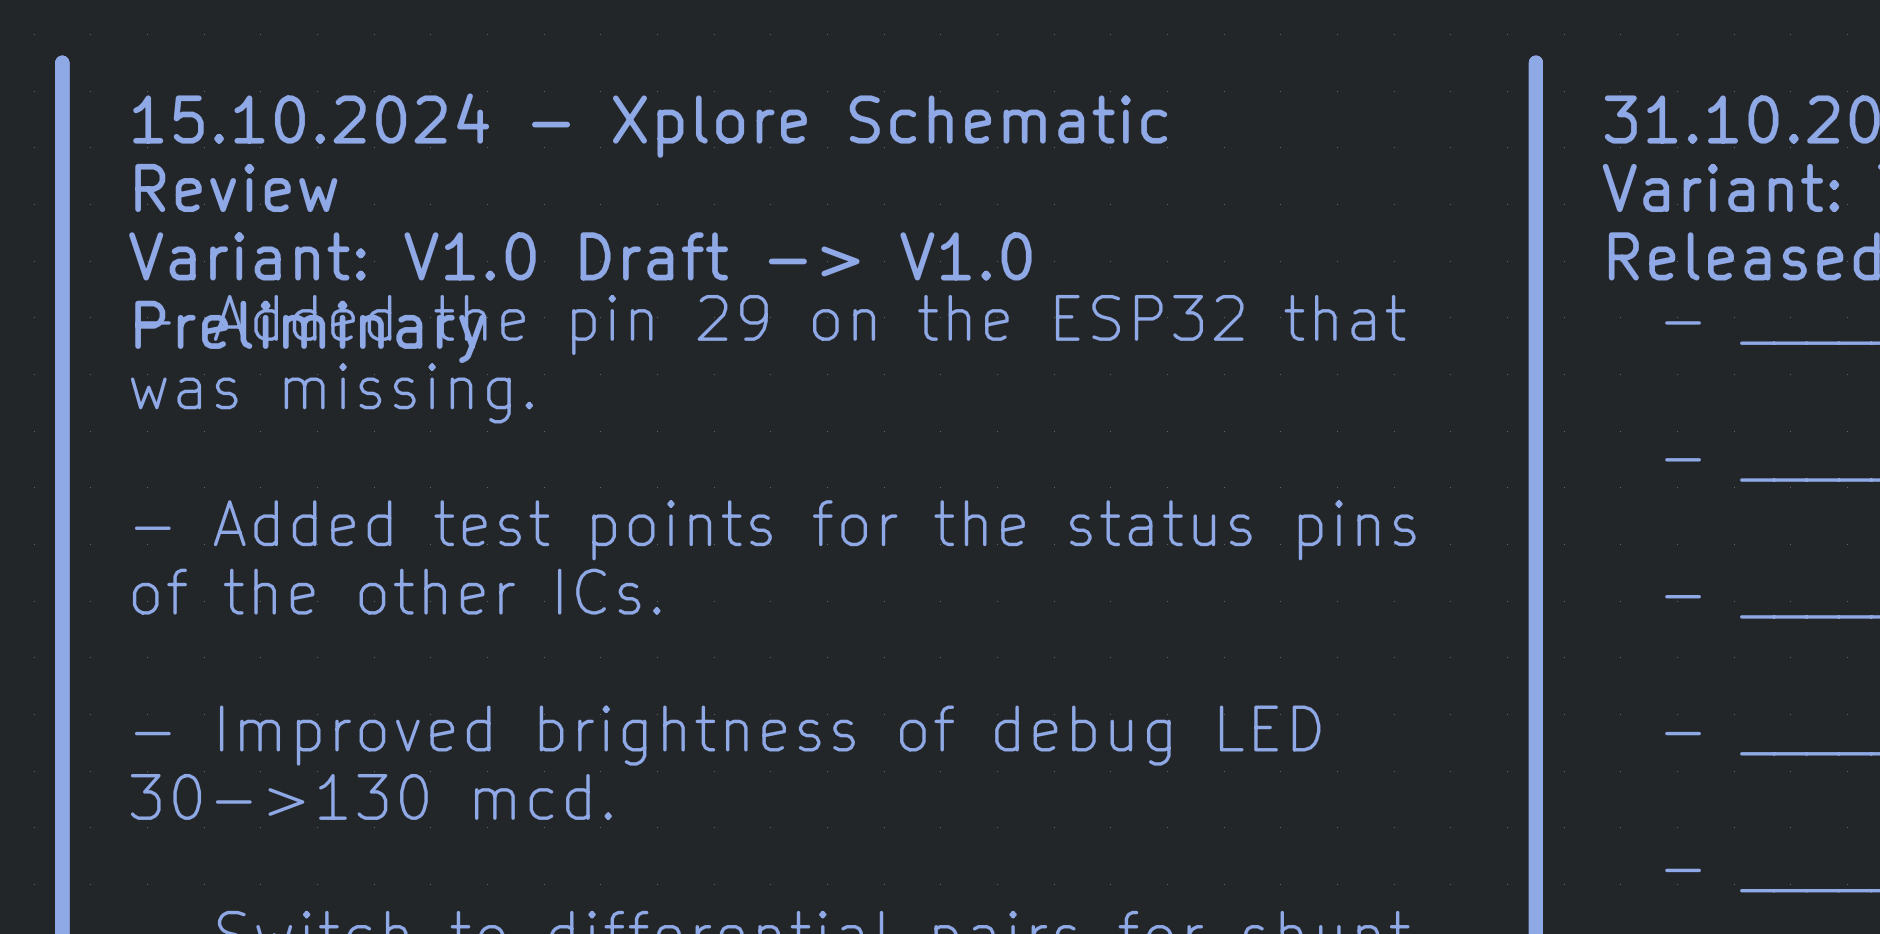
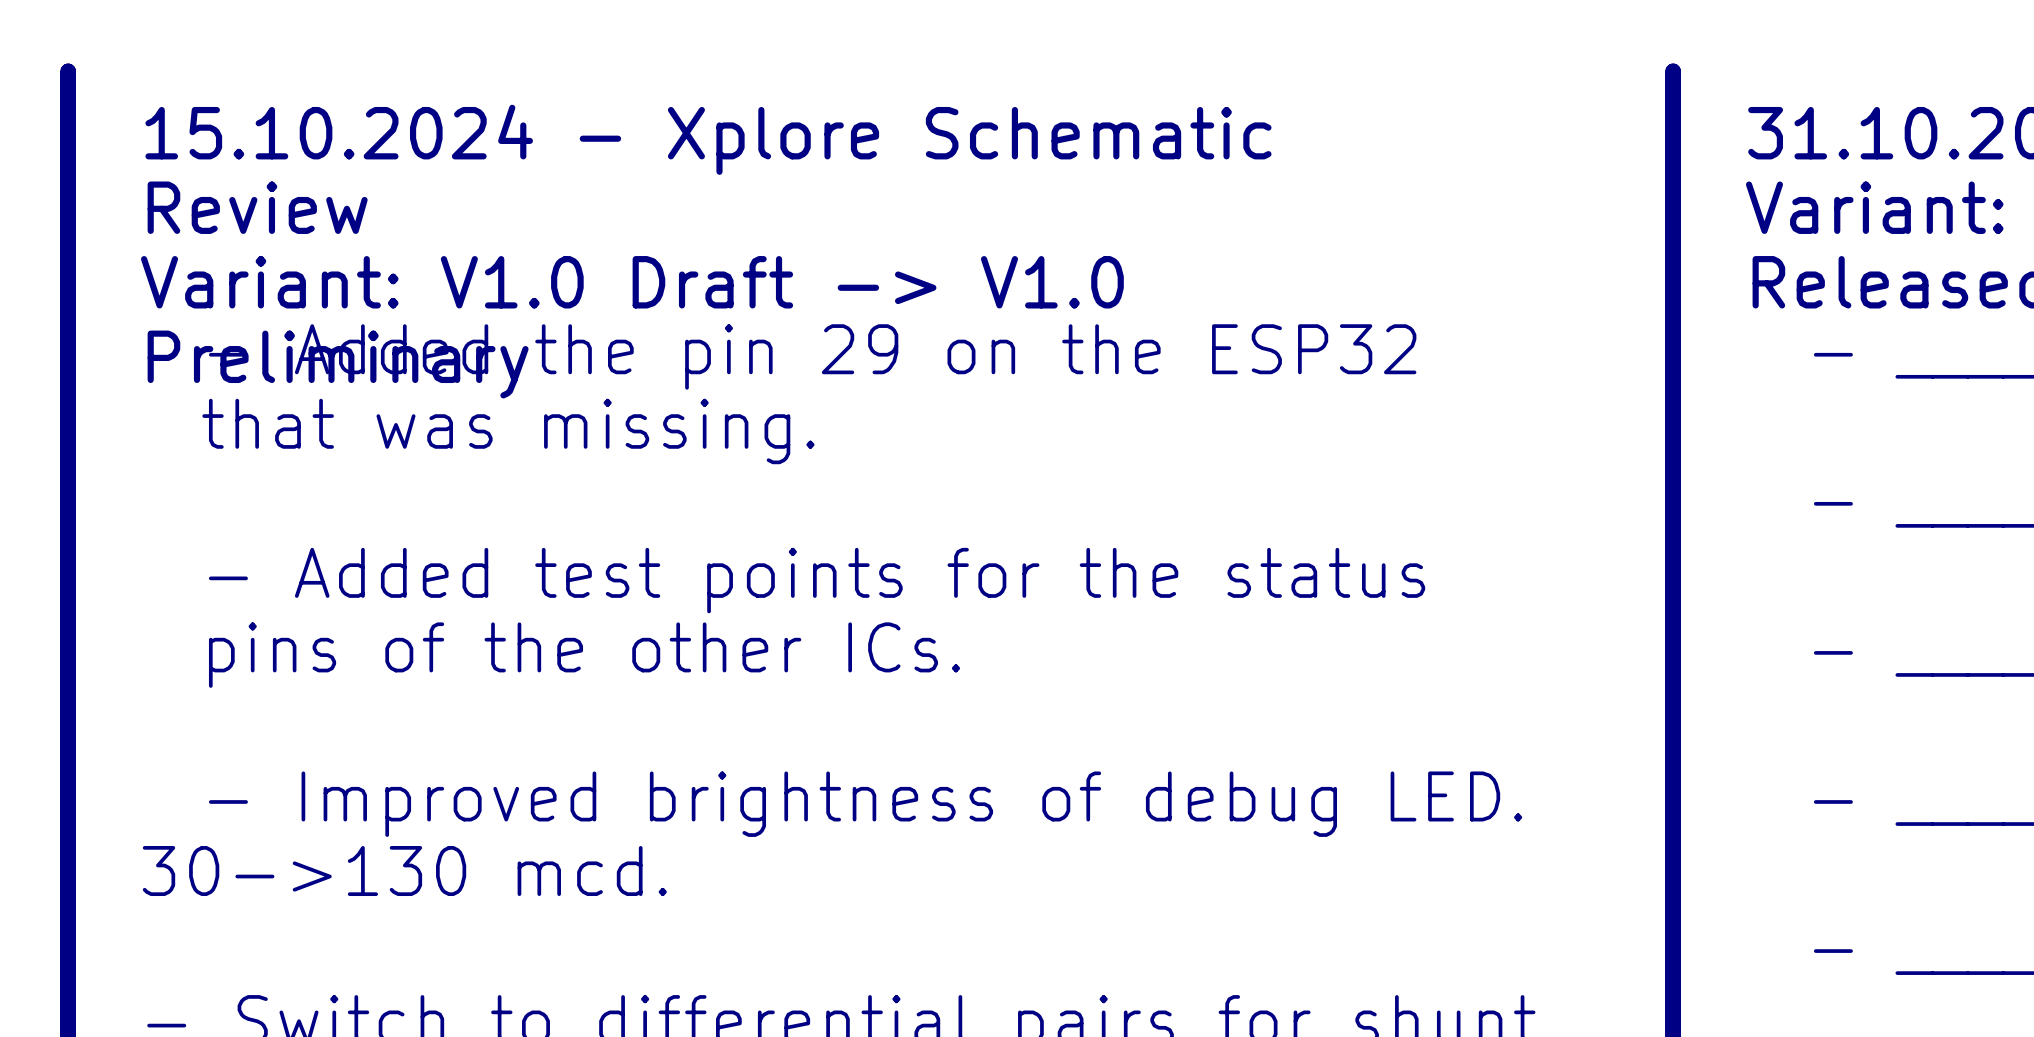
text: - Added the pin 29 on the ESP32 that (770, 324) -> - Added the pin 29 on the ESP32 (812, 356)
text: was missing. (331, 393) -> that was missing. (508, 431)
text: - Added test points for the status pins (775, 530) -> - Added test points for the status (817, 580)
text: of the other ICs. (396, 591) -> pins of the other ICs. (584, 655)
text: - Improved brightness of debug LED (727, 735) -> - Improved brightness of debug LED. (865, 804)

